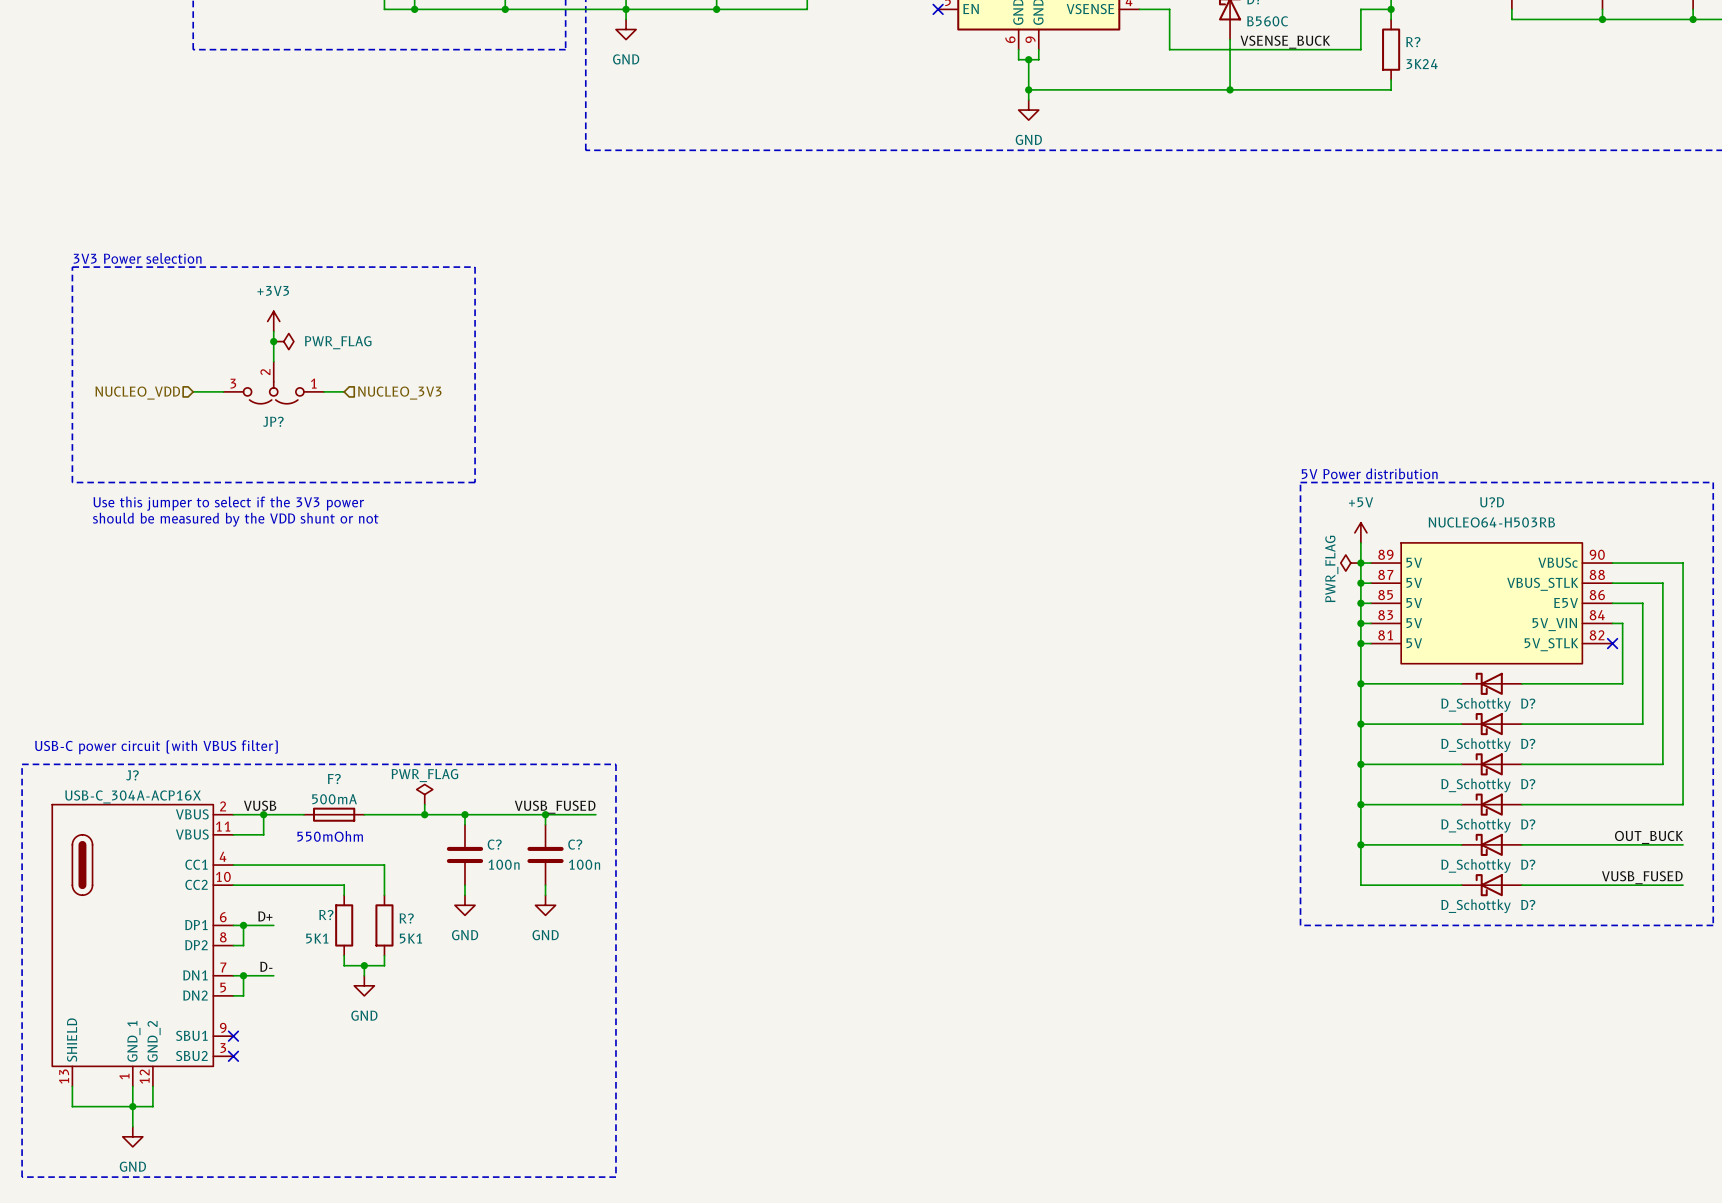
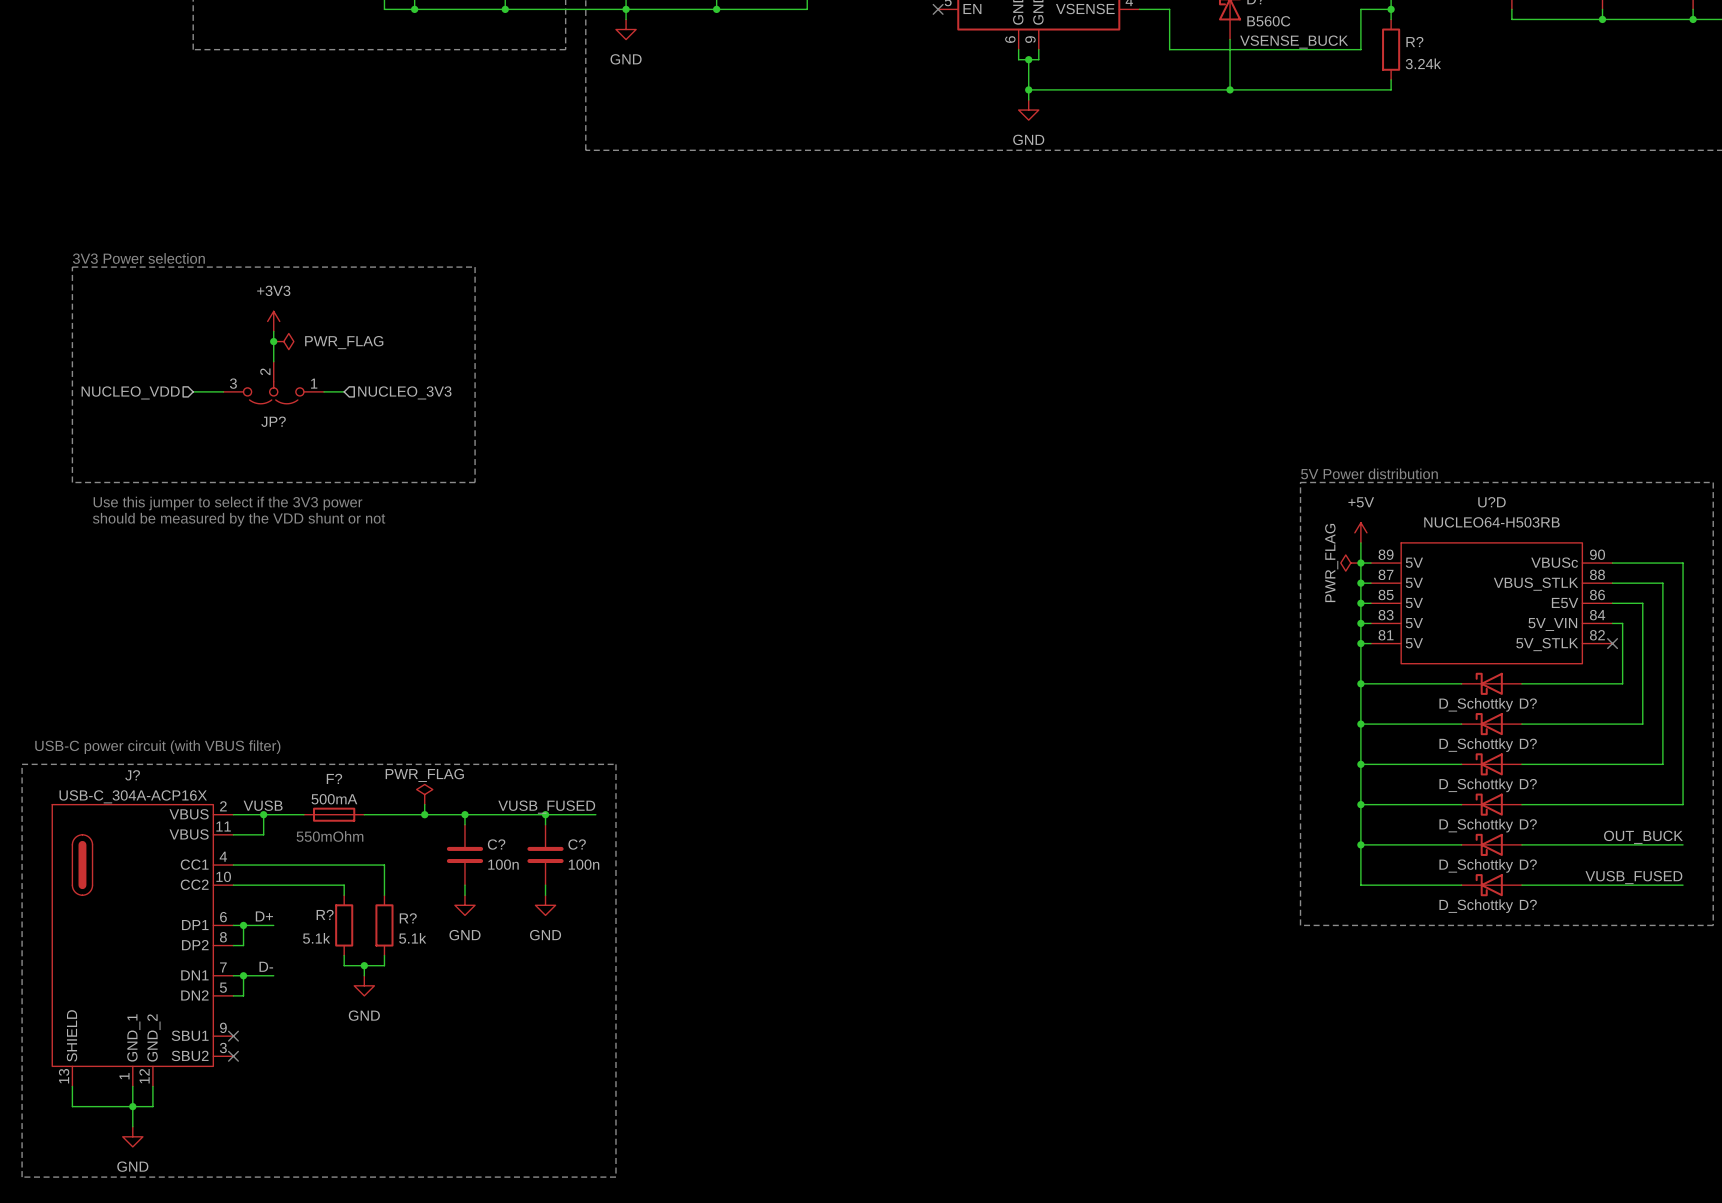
R? value: 3K24 (1422, 64) -> 3.24k (1423, 63)
R? value: 5K1 (317, 938) -> 5.1k (316, 938)
R? value: 5K1 (410, 938) -> 5.1k (412, 938)

